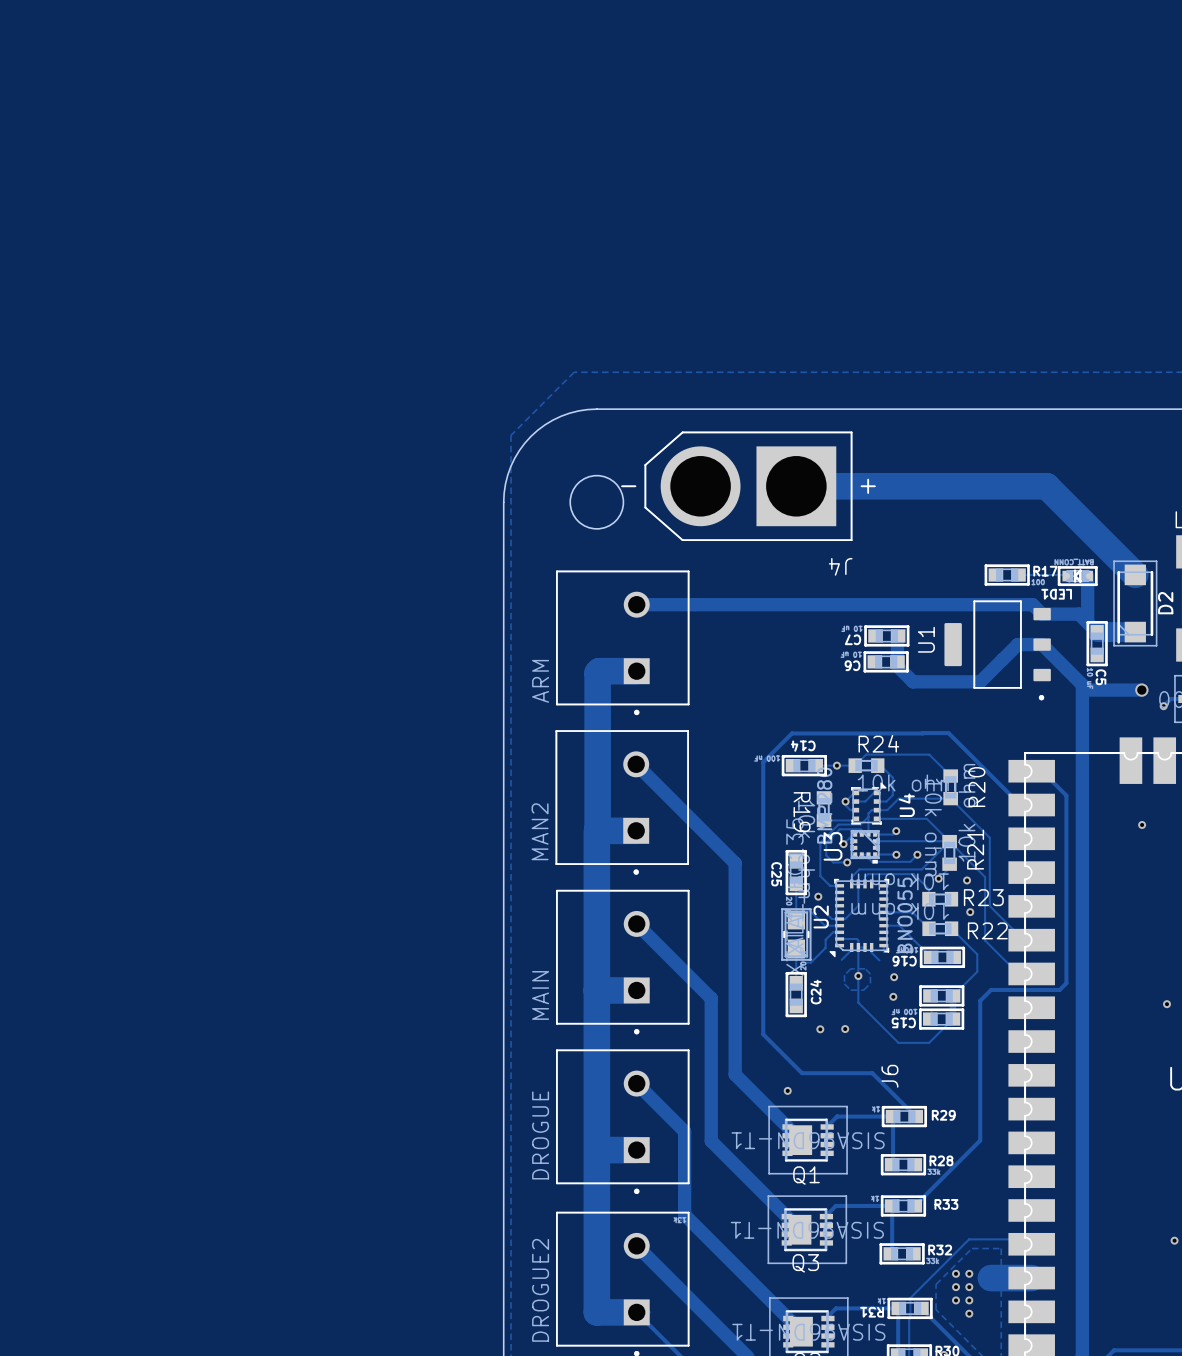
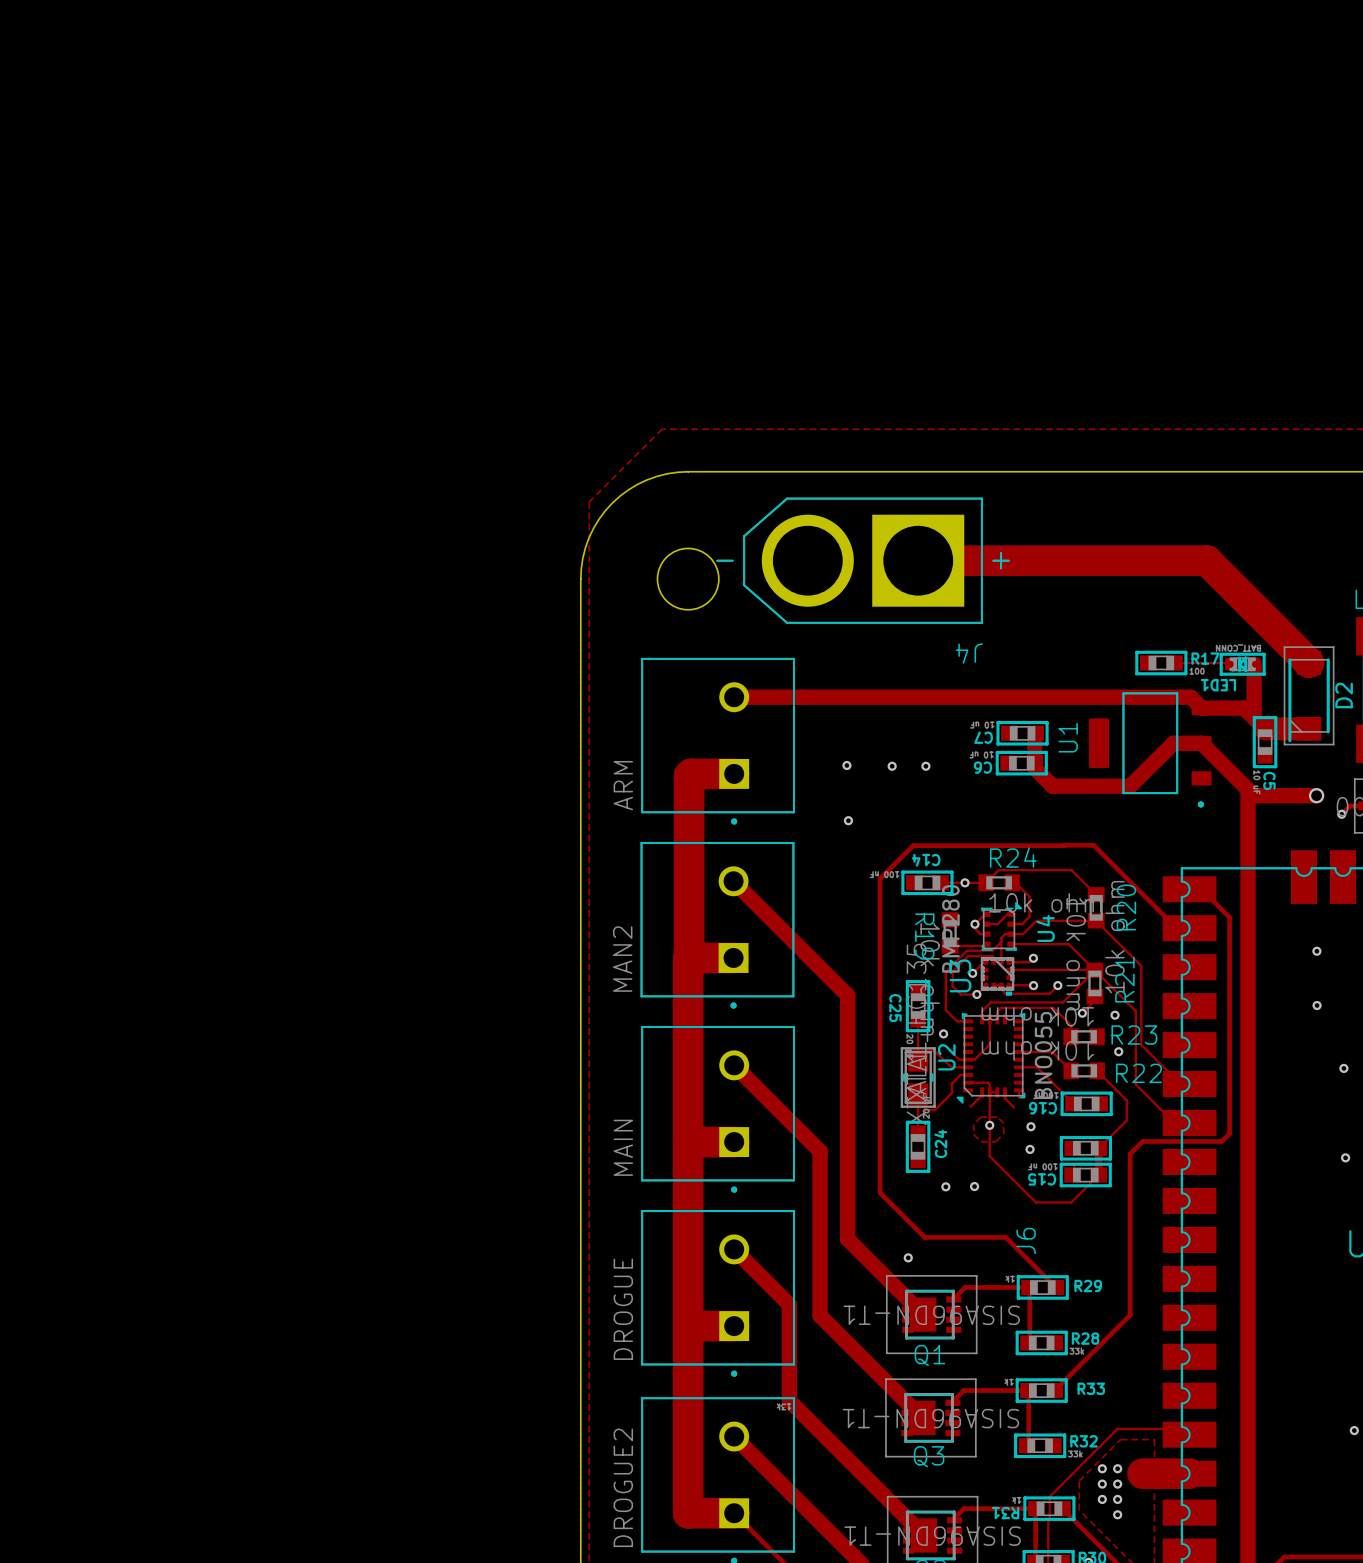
via: none -> (846, 765)
via: none -> (892, 766)
via: none -> (925, 766)
via: none -> (848, 820)
via: none -> (1317, 1005)
via: none -> (1343, 1068)

